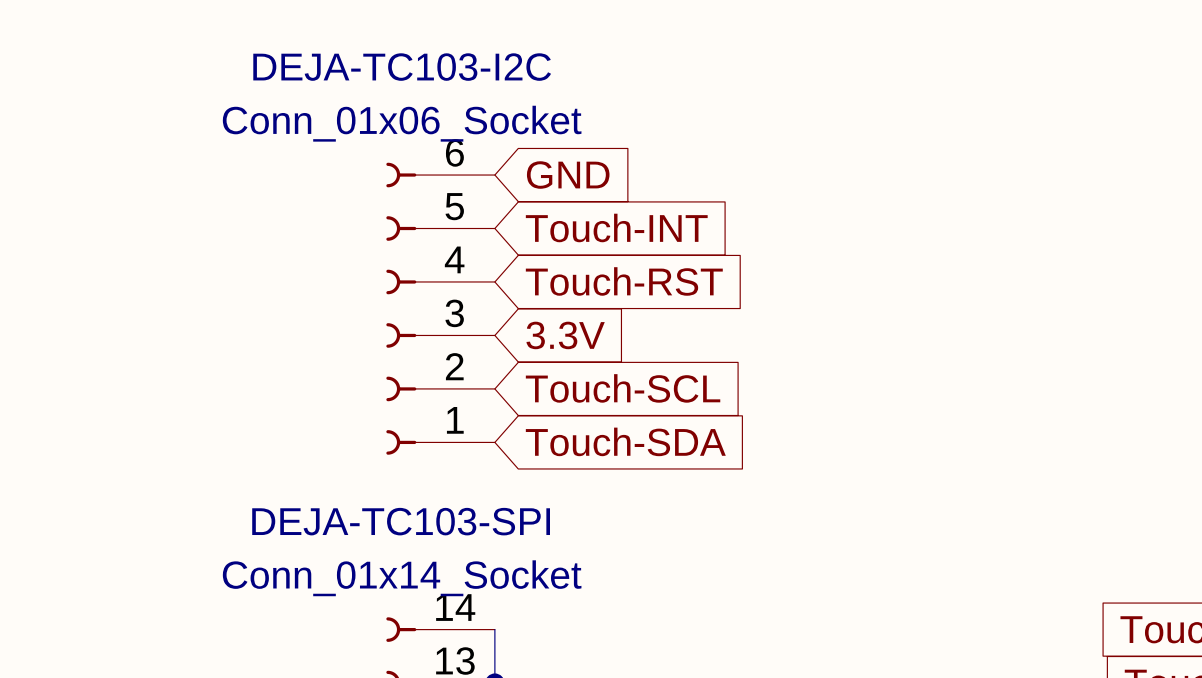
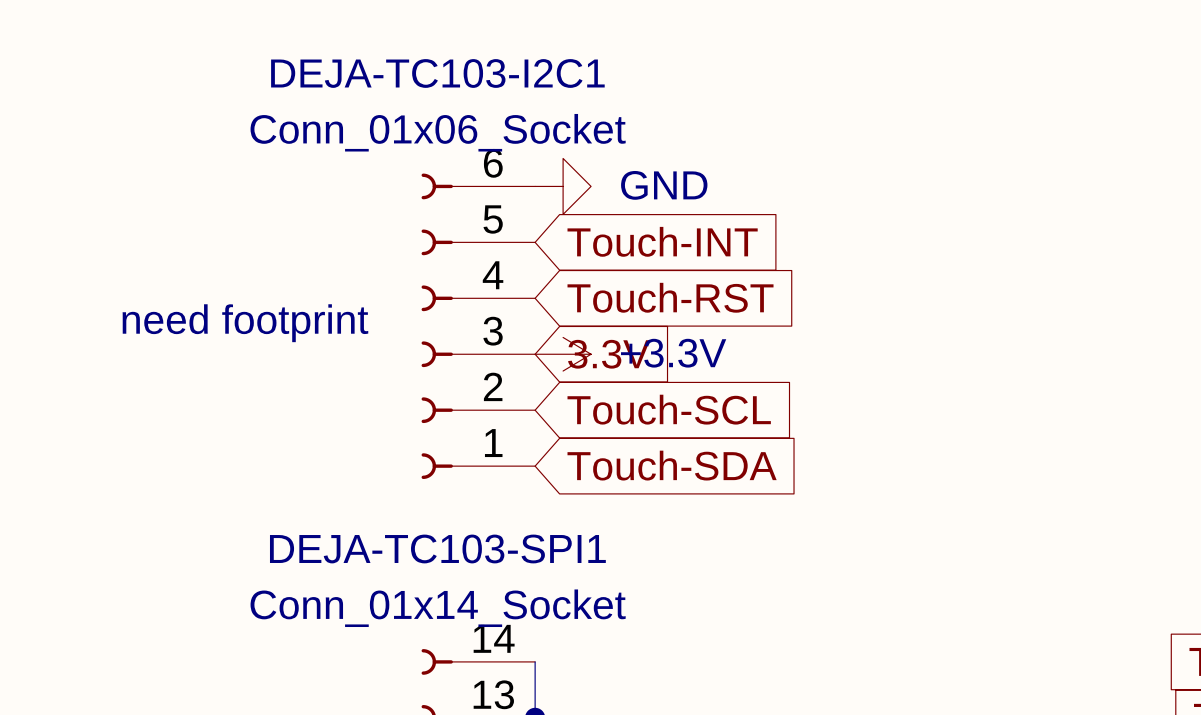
DEJA-TC103-I2C name: DEJA-TC103-I2C (402, 67) -> DEJA-TC103-I2C1 (437, 73)
power symbol: none -> GND (563, 186)
global label: GND (568, 175) -> none
text: none -> need footprint (245, 323)
power symbol: none -> +3.3V (563, 354)
DEJA-TC103-SPI name: DEJA-TC103-SPI (401, 521) -> DEJA-TC103-SPI1 (437, 548)

